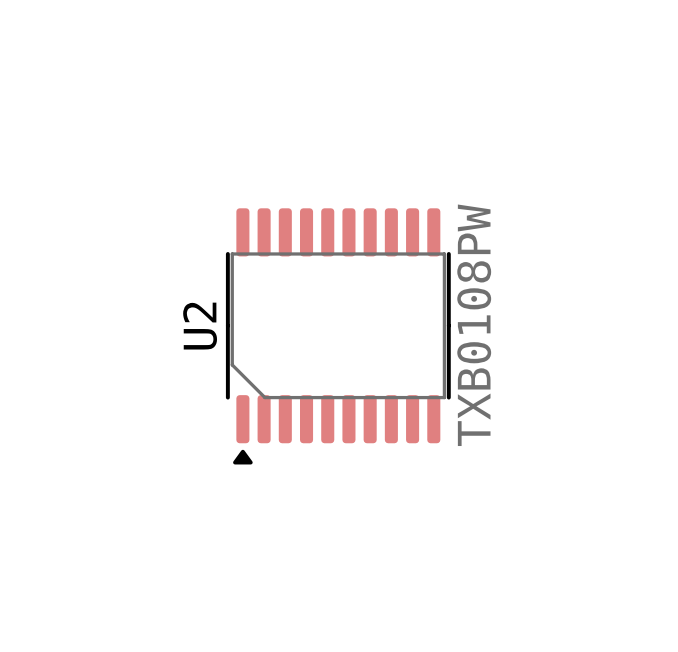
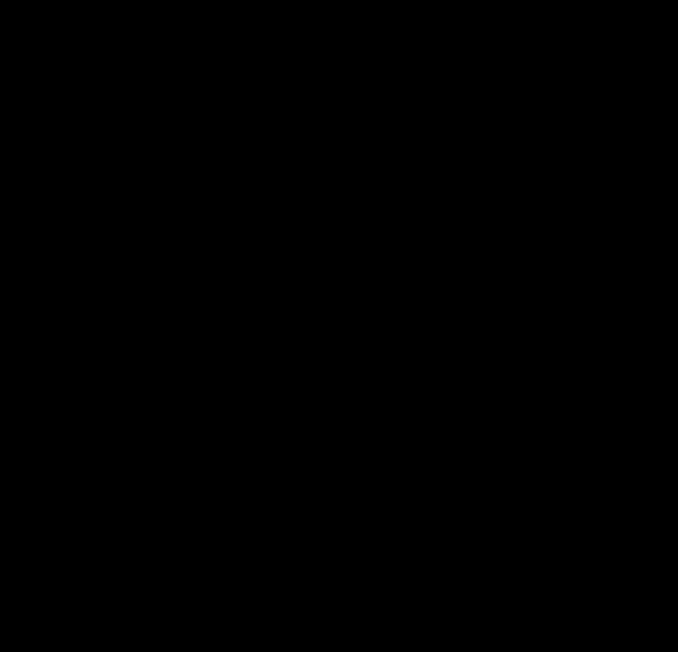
U2: TXB0108PW (338, 336) -> none

